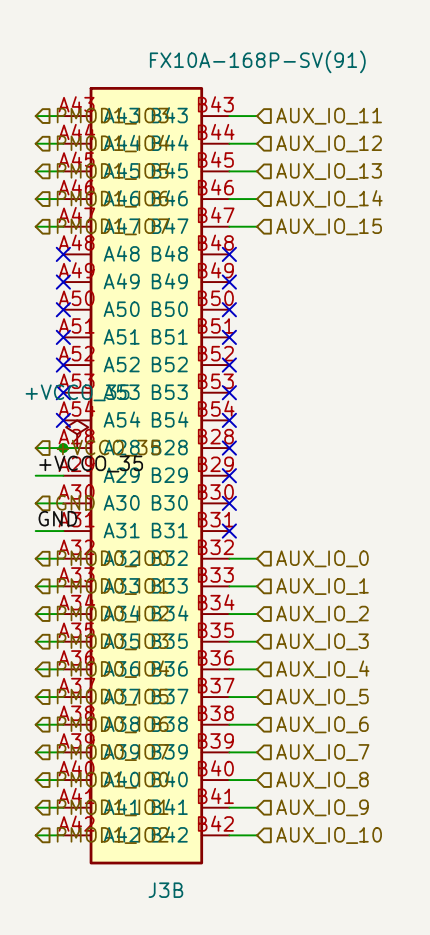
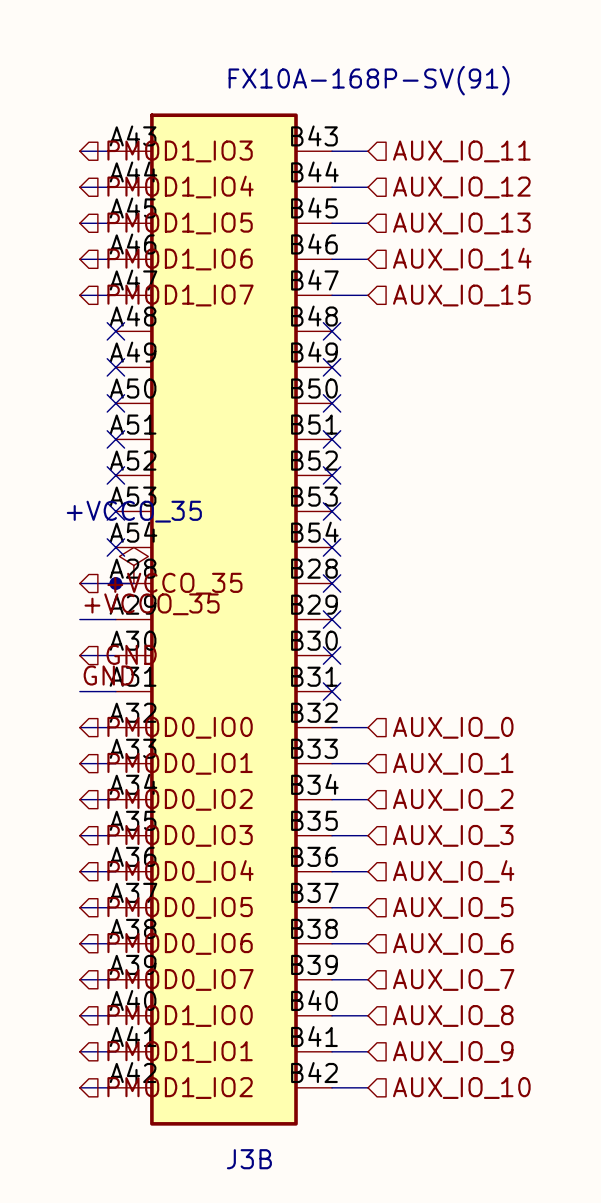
J3B symbol: [63, 87, 230, 865] -> [115, 113, 333, 1126]

